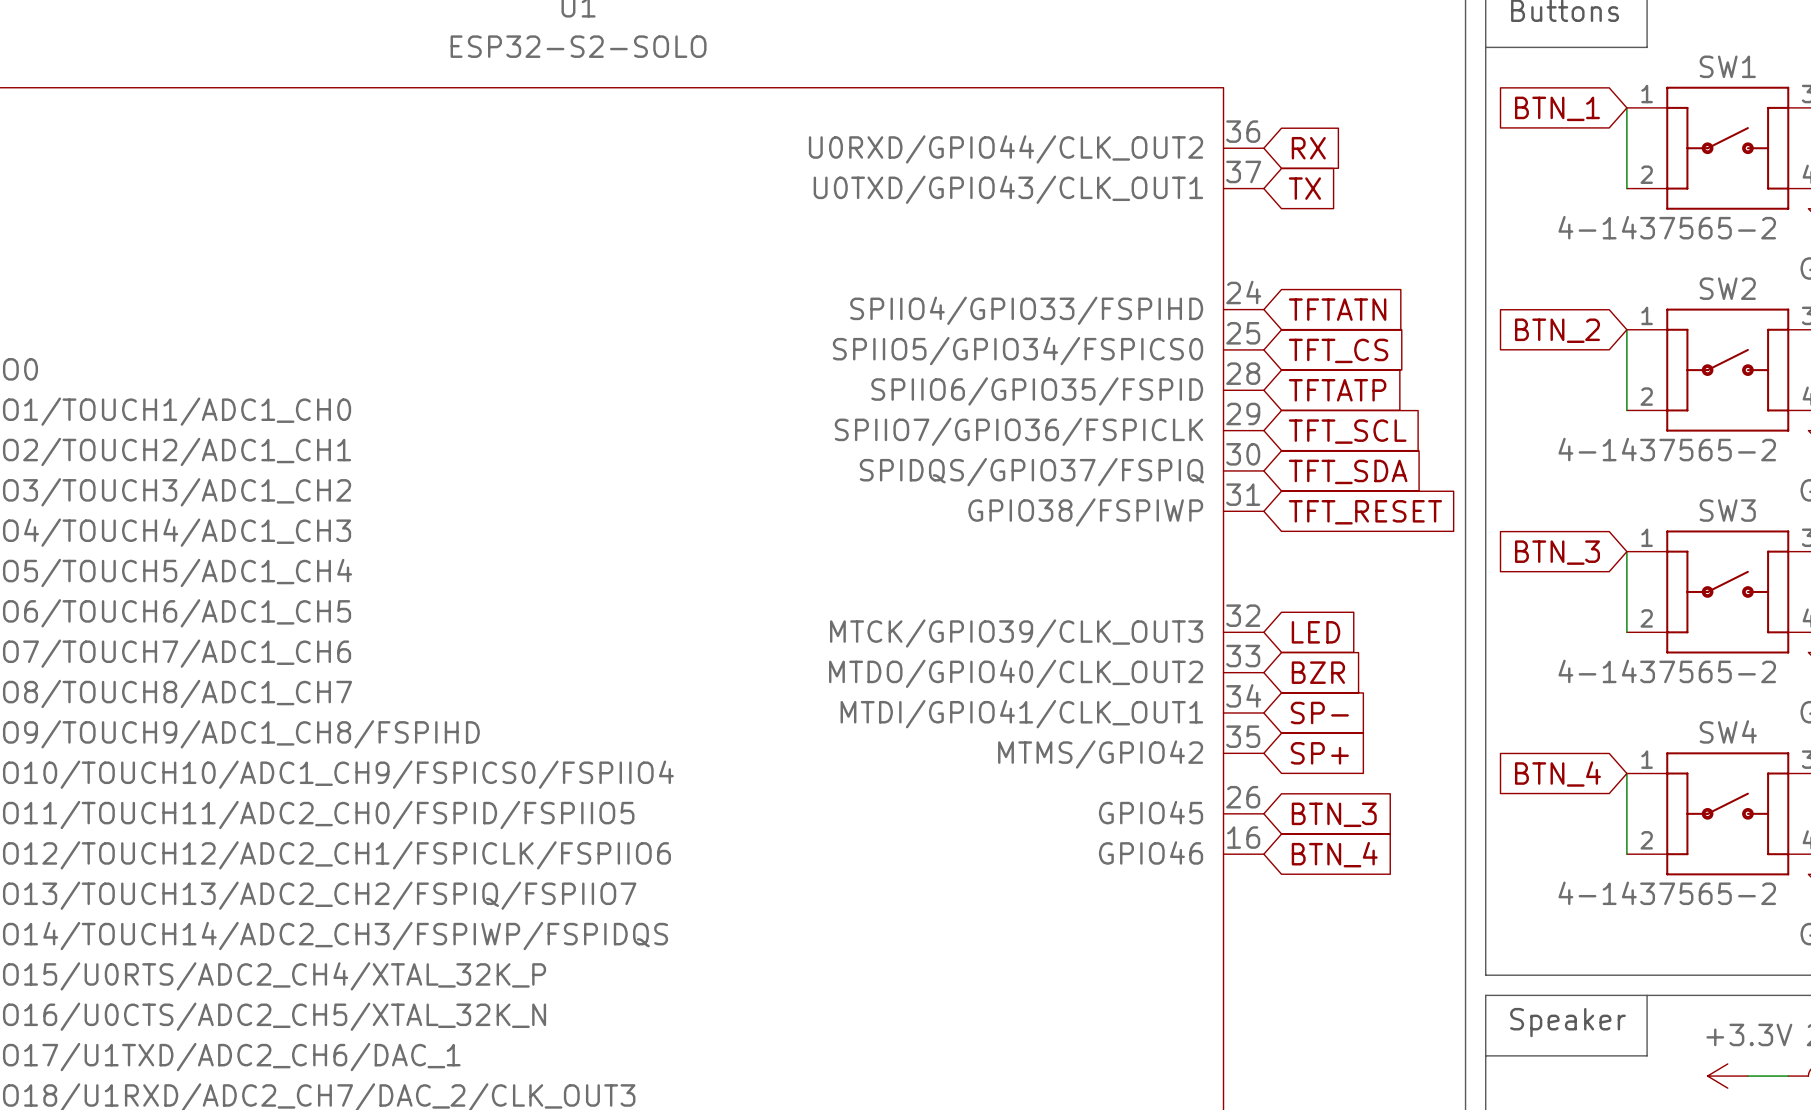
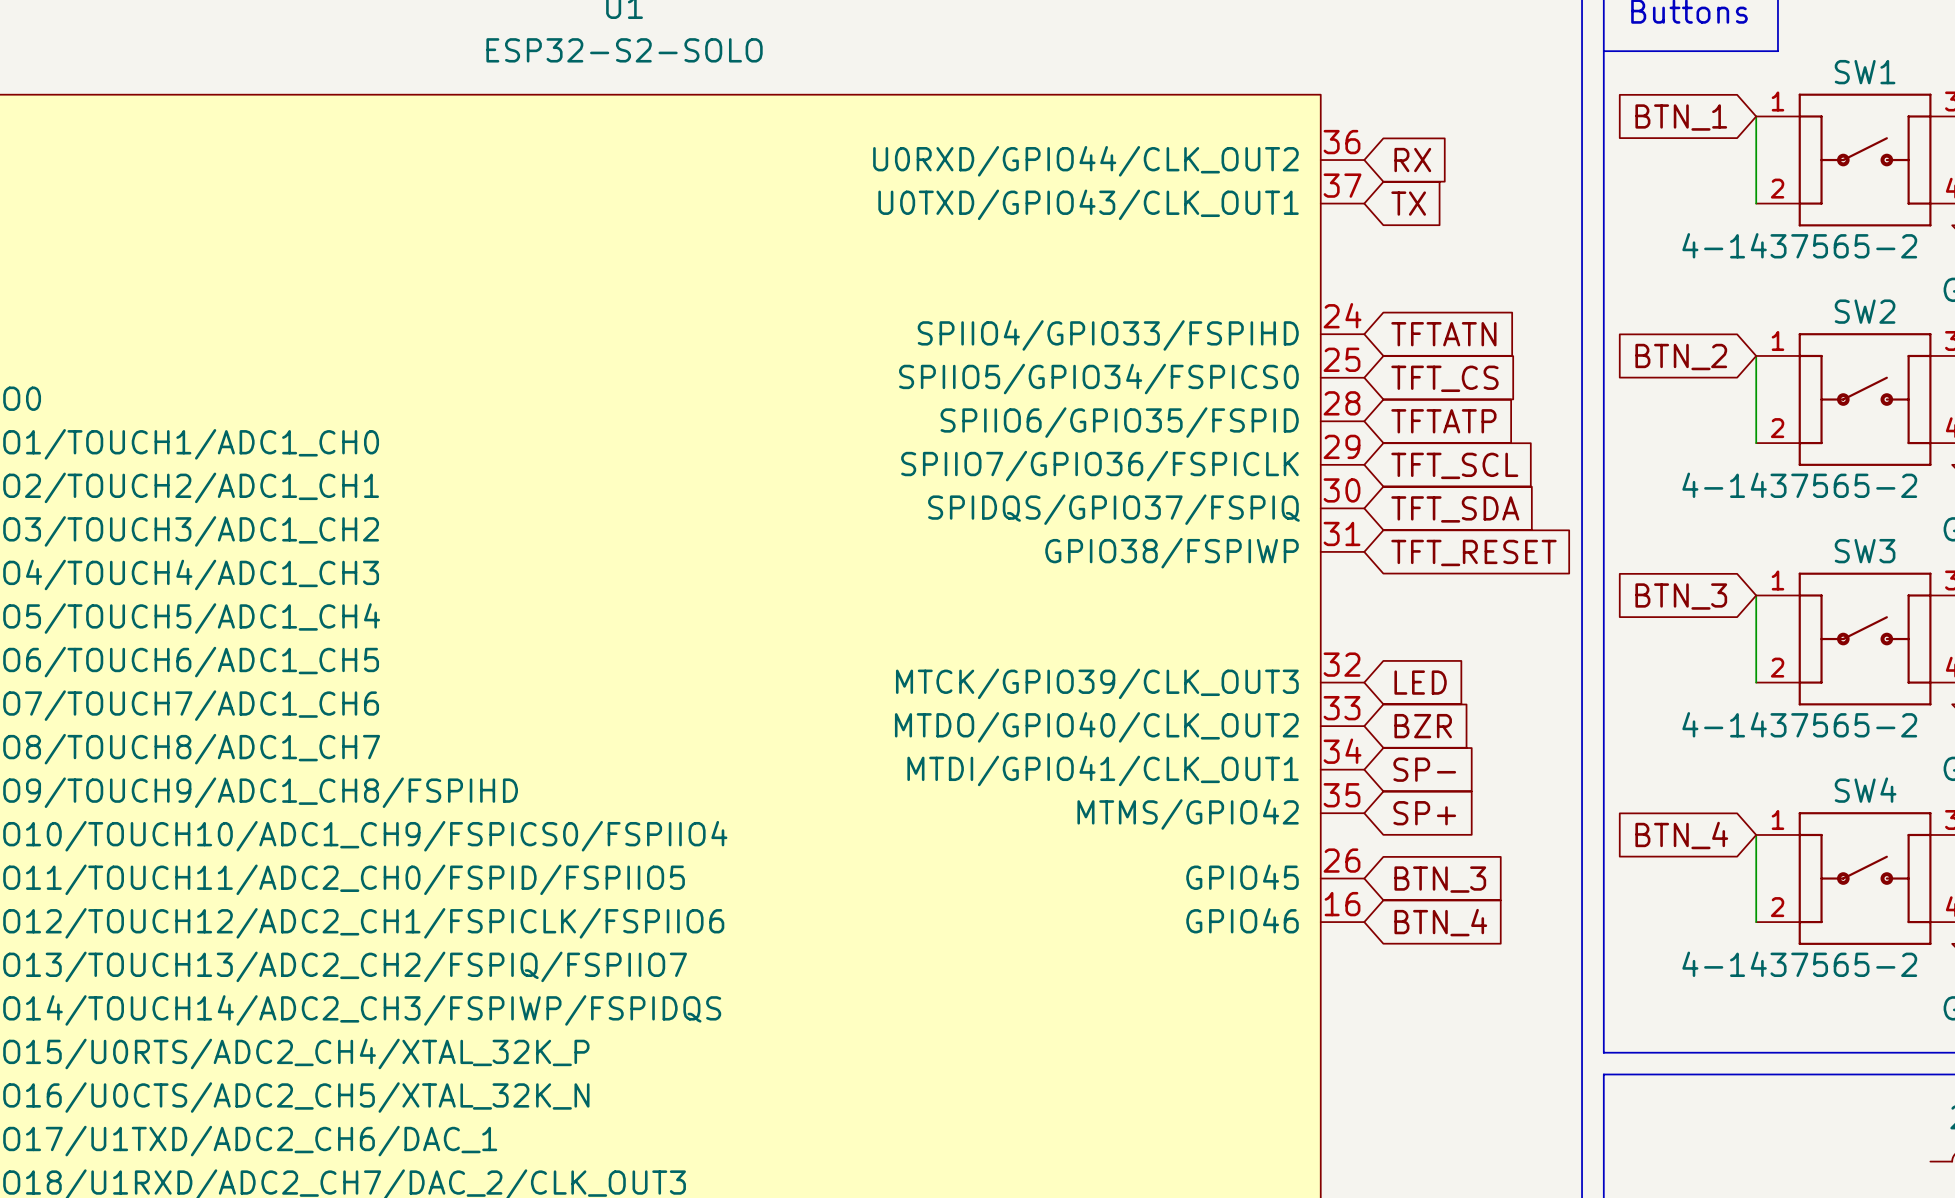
line: (1647, 995) (1647, 1055) (1485, 1055) -> none
text: Speaker (1567, 1022) -> none
power symbol: +3.3V (1727, 1076) -> none
wire: (1747, 1076) (1788, 1076) -> none

